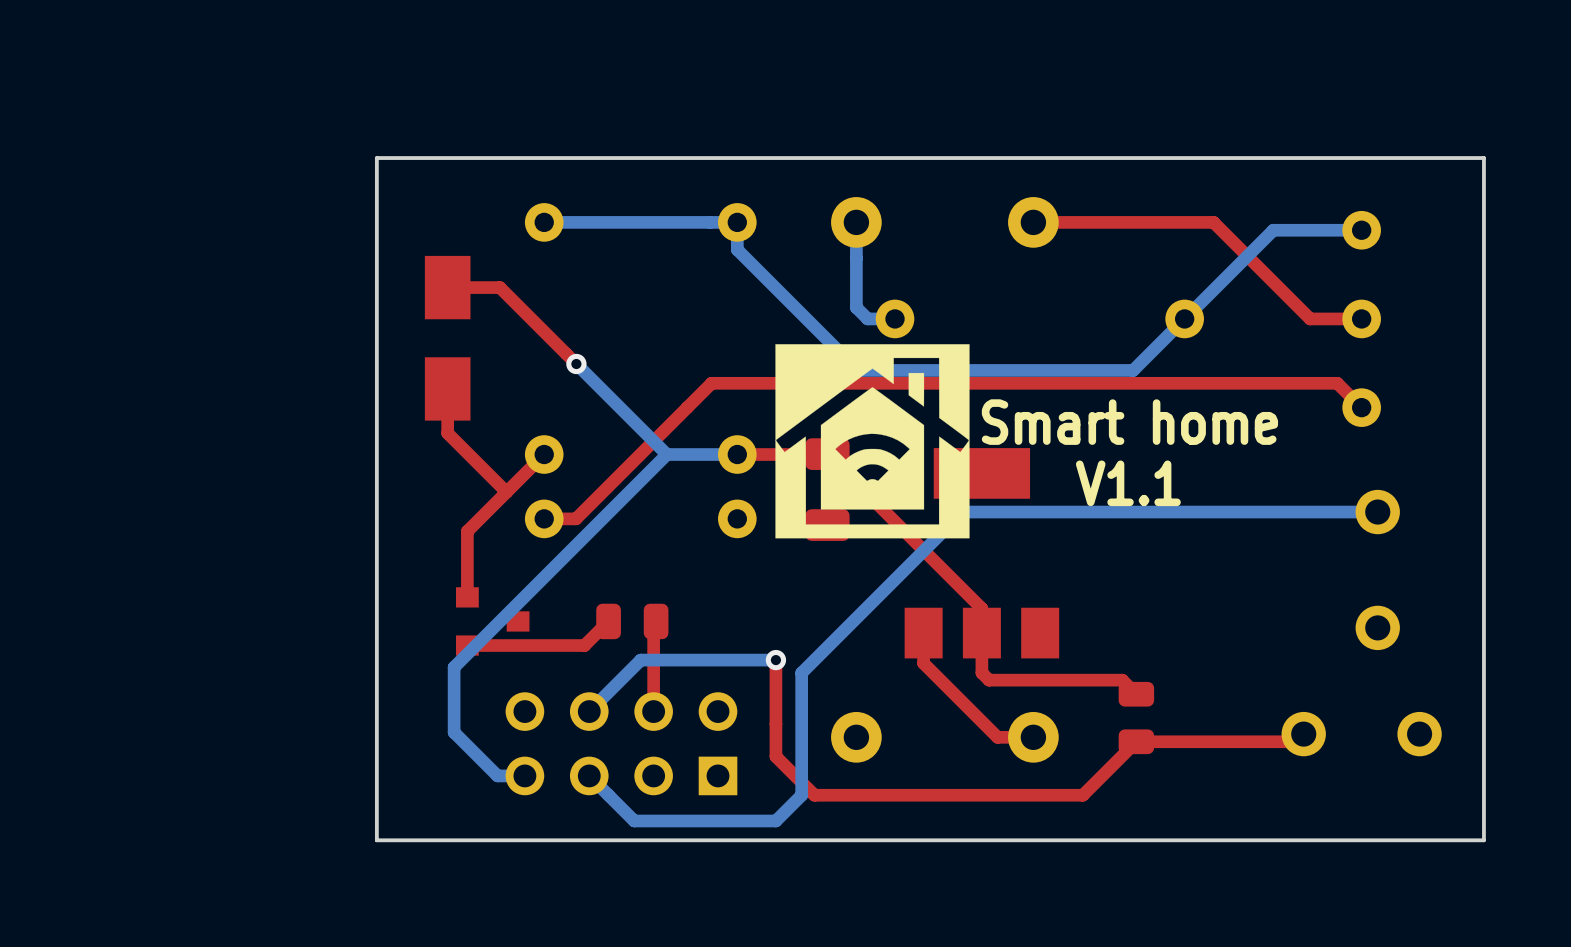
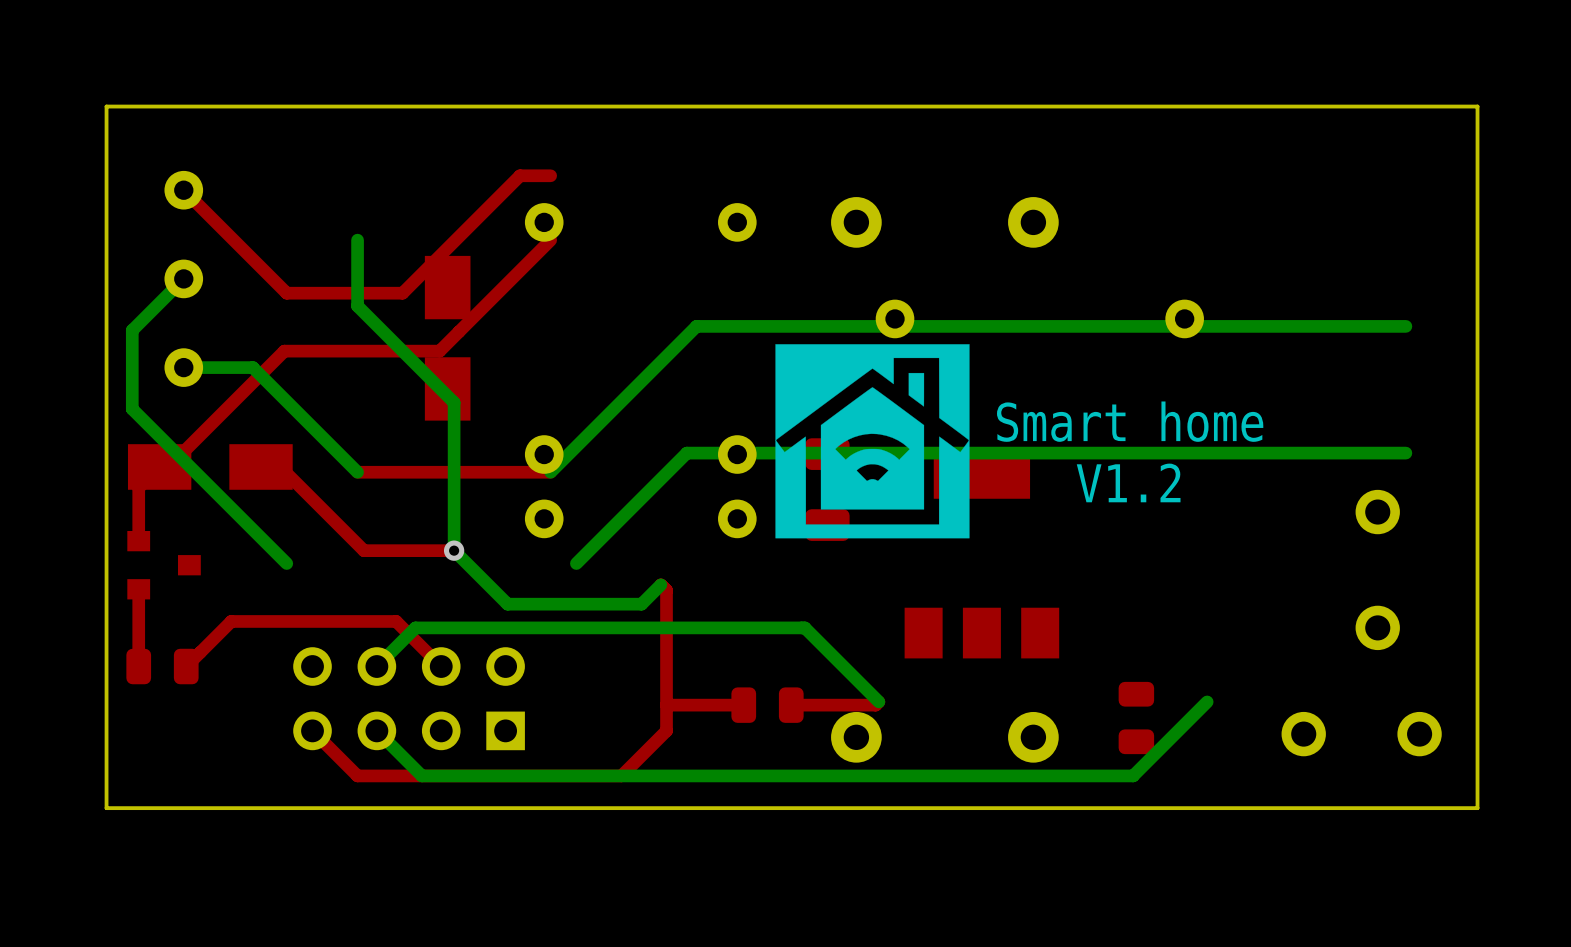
board edge: (1483, 158) (1483, 840) (376, 840) (376, 158) (1483, 158) -> (1477, 106) (1477, 808) (106, 808) (106, 106) (1477, 106)
top track: none -> (550, 175) (520, 175) (402, 293) (286, 293) (183, 190)
bottom track: (544, 222) (737, 222) (737, 249) (858, 370) (1133, 370) (1273, 230) (1361, 230) -> none
bottom track: (856, 222) (856, 307) (867, 318) (895, 318) -> none
top track: (1033, 222) (1213, 222) (1310, 318) (1361, 318) -> none
bottom track: none -> (357, 240) (357, 306) (454, 402) (454, 550) (507, 604) (641, 604) (660, 584)
top track: none -> (550, 240) (439, 351) (284, 351) (168, 466) (159, 466) (138, 487) (138, 541)
bottom track: none -> (183, 278) (132, 330) (132, 409) (286, 563)
part: none -> (183, 278)
top track: (447, 287) (499, 287) (576, 364) -> none
part: (1361, 318) -> none
bottom track: none -> (1405, 326) (696, 326) (550, 472)
bottom track: (576, 364) (666, 454) -> none
via: (576, 364) -> none
bottom track: none -> (183, 367) (252, 367) (357, 472)
top track: (447, 388) (447, 433) (506, 492) -> none
top track: (1361, 407) (1337, 383) (711, 383) (576, 518) (544, 518) -> none
bottom track: none -> (1405, 453) (686, 453) (576, 563)
top track: (544, 454) (467, 531) (467, 597) -> none
bottom track: (666, 454) (454, 667) (454, 732) (497, 775) -> (376, 730) (421, 775) (497, 775)
bottom track: (737, 454) (666, 454) -> none
top track: (737, 454) (827, 454) (981, 608) (981, 672) (989, 680) (1122, 680) (1136, 694) -> none
part: none -> (210, 466)
top track: none -> (261, 466) (280, 466) (364, 550) (454, 550)
top track: none -> (550, 472) (357, 472)
text: V1.1 (1128, 483) -> V1.2 (1128, 482)
bottom track: (1377, 512) (962, 512) (801, 672) (801, 795) (775, 820) (634, 820) (589, 775) -> none
via: none -> (454, 550)
top track: none -> (660, 584) (666, 590) (666, 730) (621, 775) (357, 775) (312, 730)
top track: none -> (138, 589) (138, 666)
part position: (492, 621) -> (164, 565)
top track: (608, 621) (584, 645) (467, 645) -> none
part position: (632, 621) -> (767, 705)
top track: (656, 621) (653, 623) (653, 711) -> none
top track: (923, 633) (923, 663) (997, 737) (1033, 737) -> none
bottom track: (775, 660) (640, 660) (589, 711) -> none
top track: (775, 660) (775, 756) (814, 795) (1082, 795) (1136, 741) (1296, 741) (1303, 734) -> none
via: (775, 660) -> none
part: none -> (162, 666)
bottom track: none -> (376, 666) (415, 627) (804, 627) (878, 701)
top track: none -> (441, 666) (396, 621) (231, 621) (186, 666)
top track: none -> (878, 701) (875, 705) (791, 705)
bottom track: none -> (1207, 701) (1133, 775) (524, 775)
top track: none -> (743, 705) (666, 705)
part position: (621, 743) -> (409, 698)

